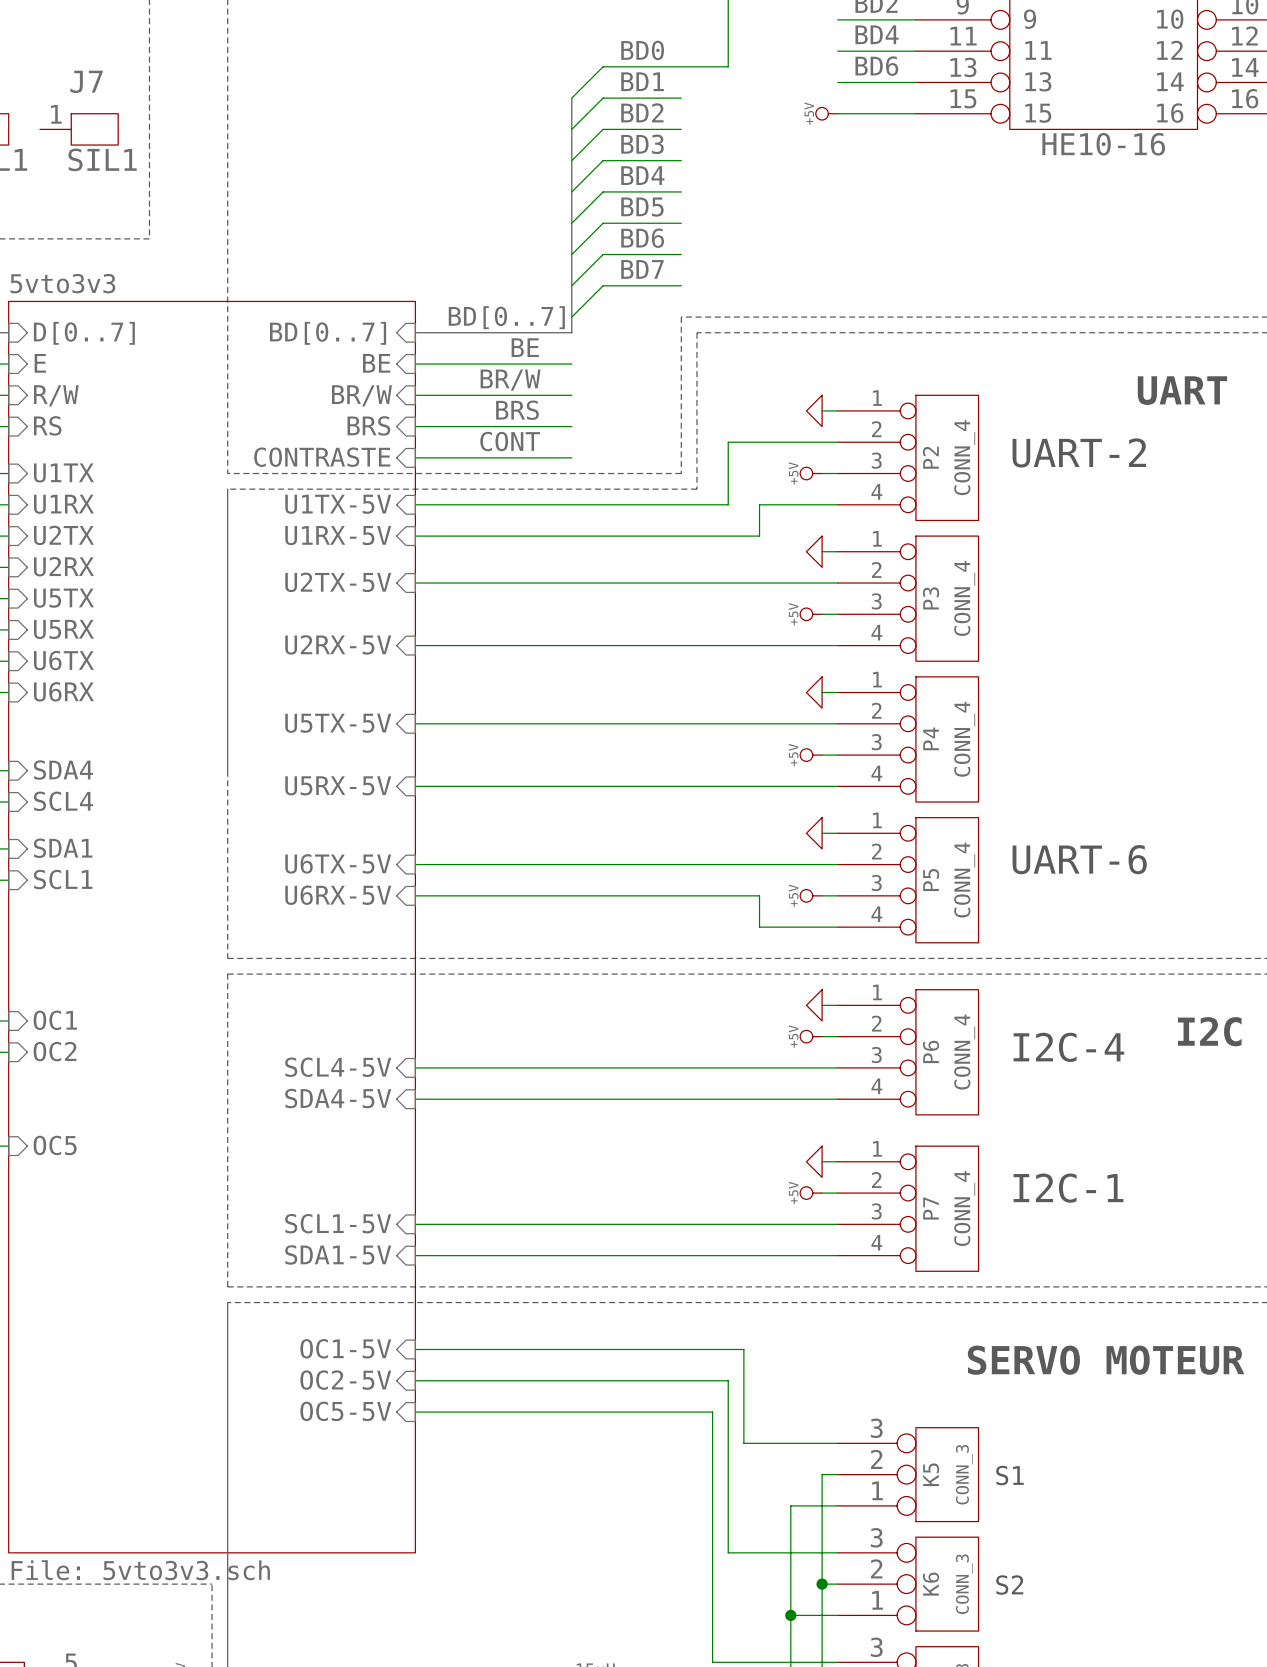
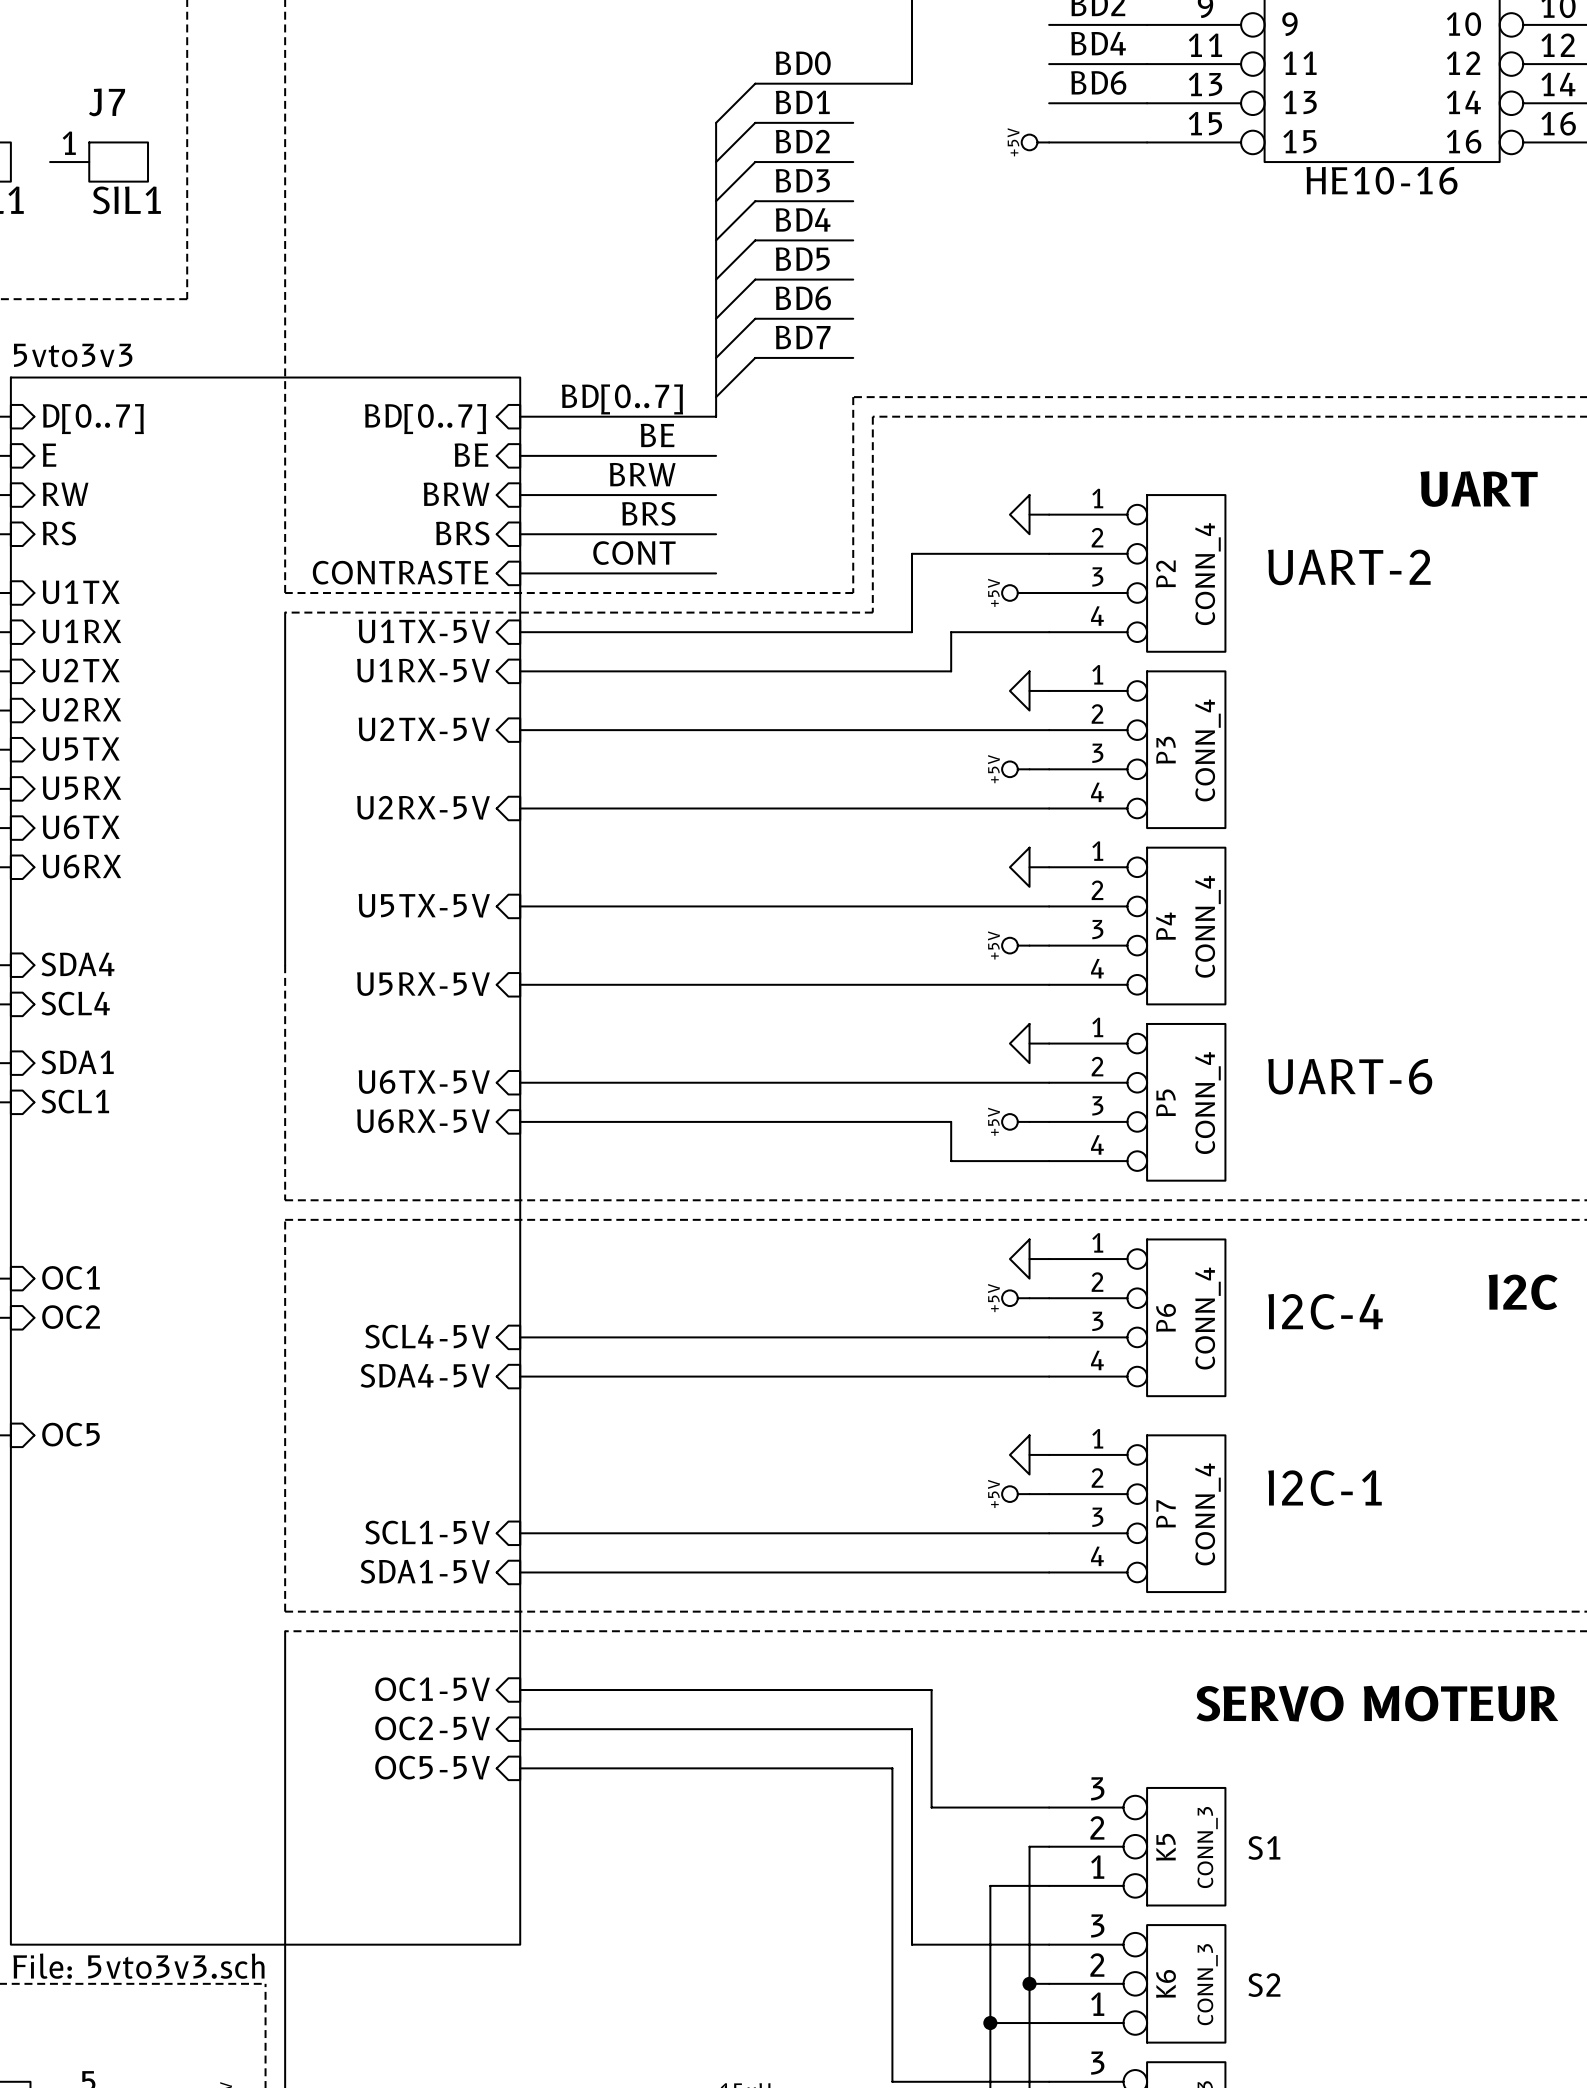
label: BR/W (510, 380) -> BRW (642, 474)
sheet pin: R/W (56, 395) -> RW (65, 494)
sheet pin: BR/W (361, 395) -> BRW (456, 494)

